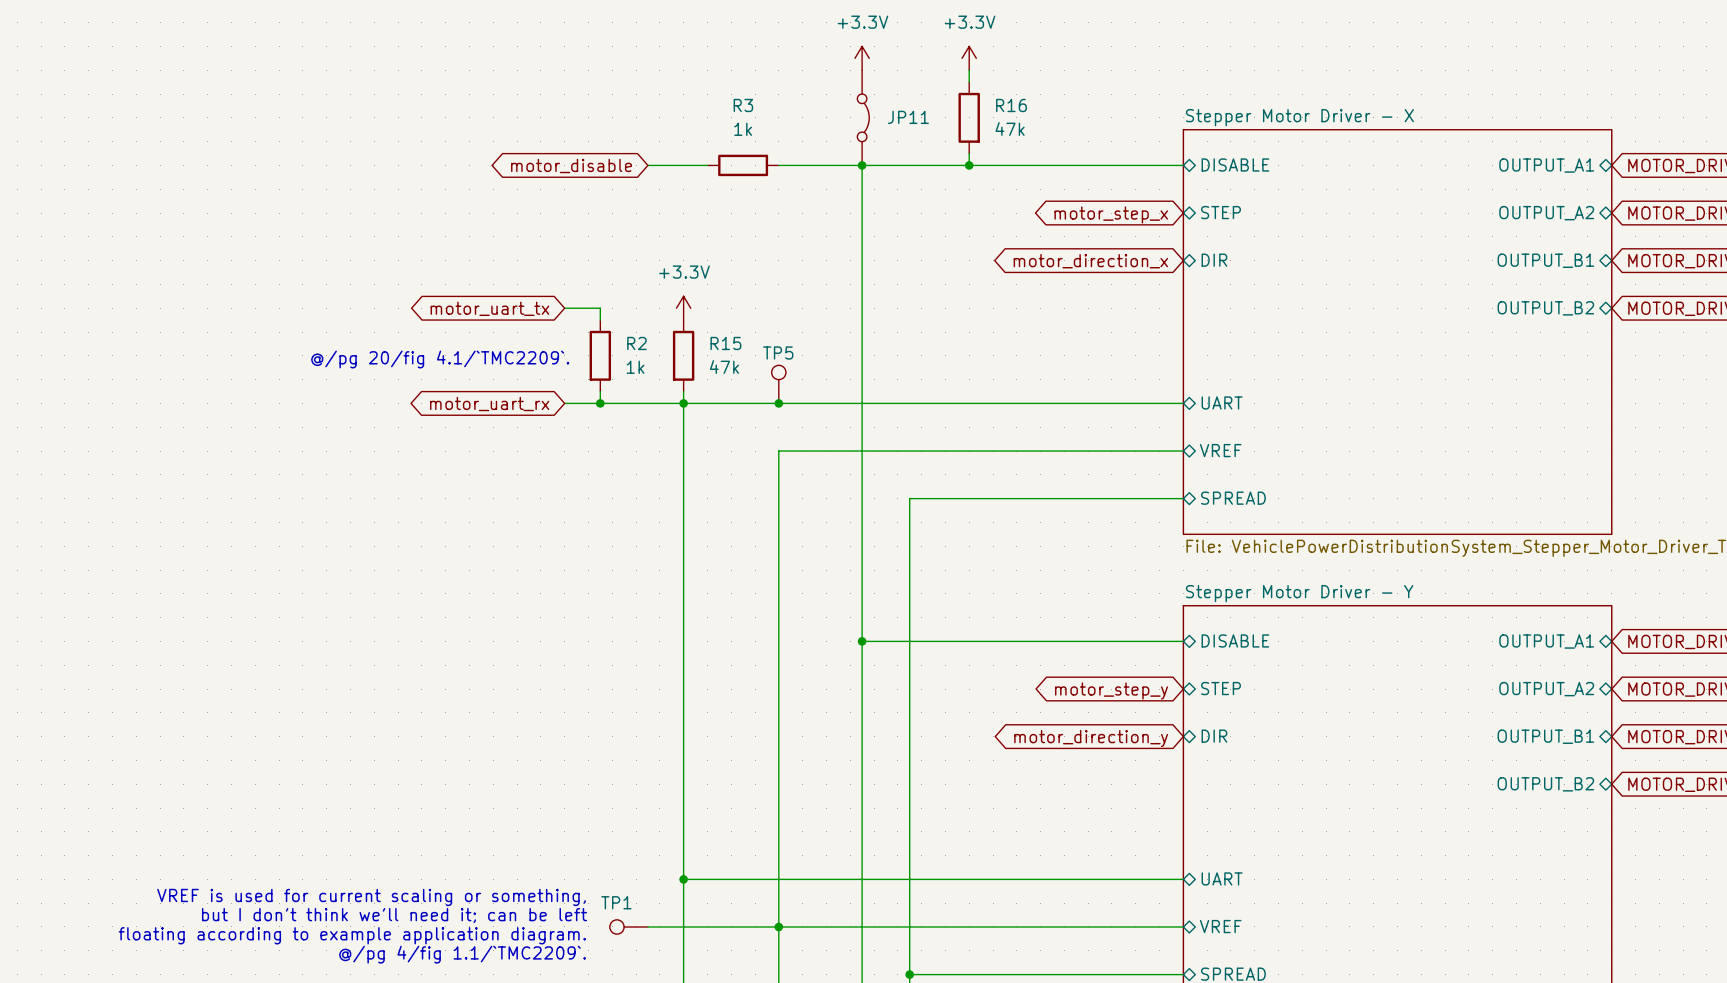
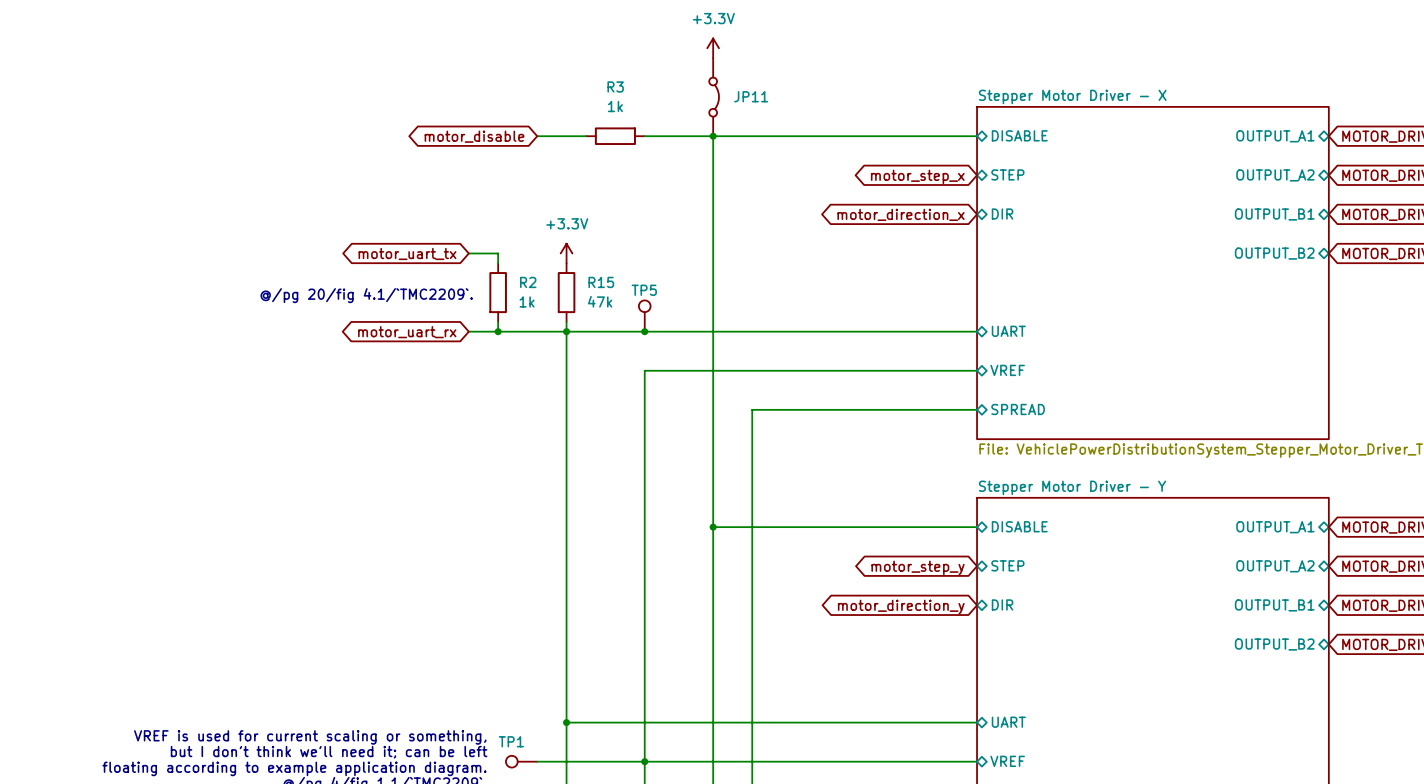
power symbol: +3.3V (969, 58) -> none
wire: (969, 70) (969, 82) -> none
R16: 47k (969, 117) -> none
wire: (969, 153) (969, 165) -> none
junction: (969, 165) -> none

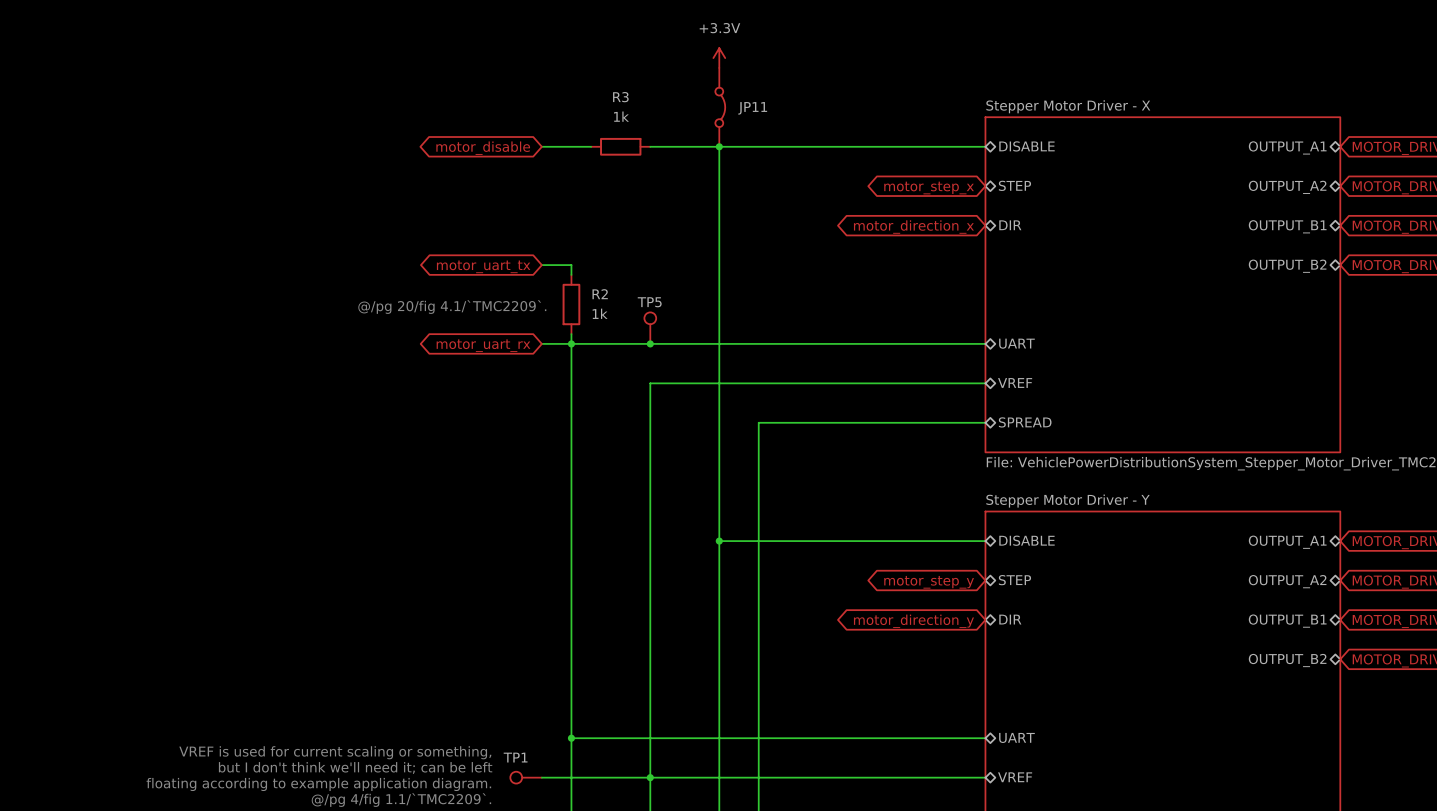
global label position: motor_uart_tx (407, 253) -> motor_uart_tx (483, 266)
wire: (468, 253) (498, 253) (498, 263) -> (541, 265) (571, 265) (571, 274)
power symbol: +3.3V (566, 253) -> none
R15 name: R15 (601, 282) -> R2 (600, 294)
R2: 1k (498, 292) -> none
text position: @/pg 20/fig 4.1/`TMC2209`. (366, 295) -> @/pg 20/fig 4.1/`TMC2209`. (452, 307)
R15 value: 47k (600, 301) -> 1k (600, 313)
wire: (498, 321) (498, 331) -> none
wire: (468, 331) (537, 331) -> none
junction: (498, 331) -> none
global label position: motor_uart_rx (407, 332) -> motor_uart_rx (483, 345)

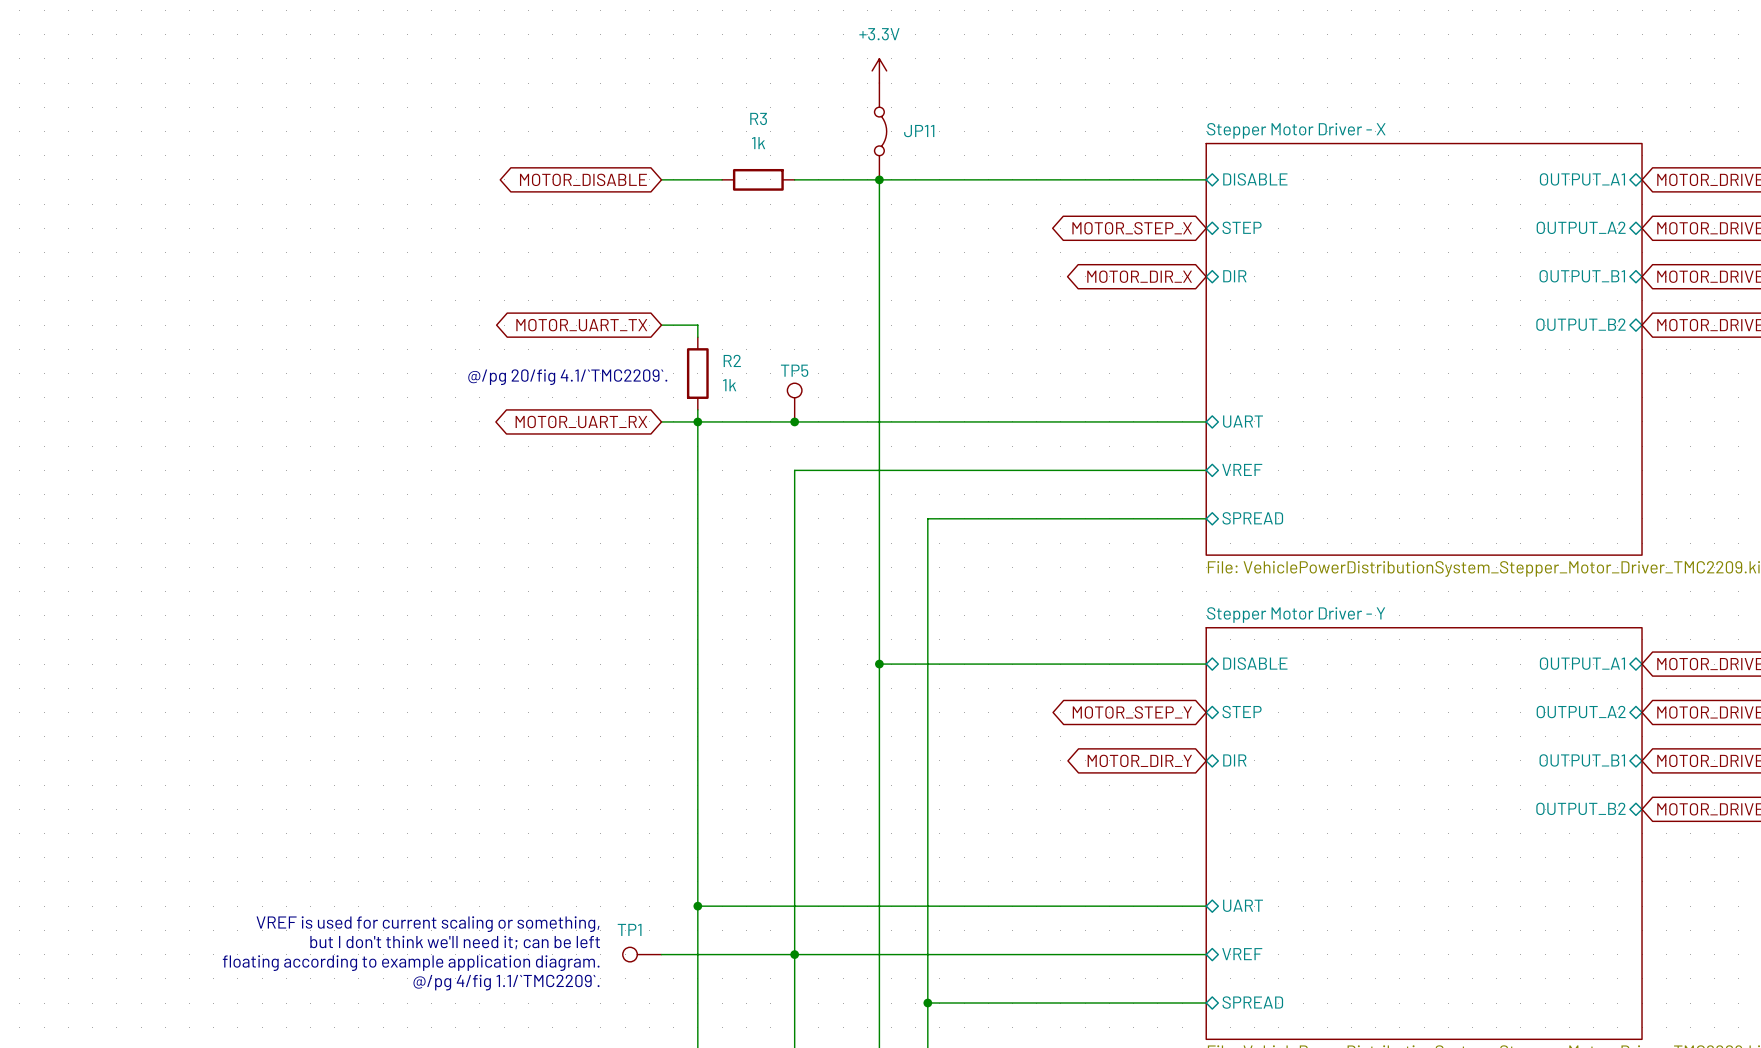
global label: motor_disable (483, 148) -> MOTOR_DISABLE (583, 179)
global label: motor_step_x (929, 187) -> MOTOR_STEP_X (1132, 228)
global label: motor_direction_x (913, 227) -> MOTOR_DIR_X (1139, 276)
global label: motor_uart_tx (483, 266) -> MOTOR_UART_TX (581, 325)
global label: motor_uart_rx (483, 345) -> MOTOR_UART_RX (581, 421)
global label: motor_step_y (929, 582) -> MOTOR_STEP_Y (1132, 712)
global label: motor_direction_y (913, 621) -> MOTOR_DIR_Y (1139, 760)

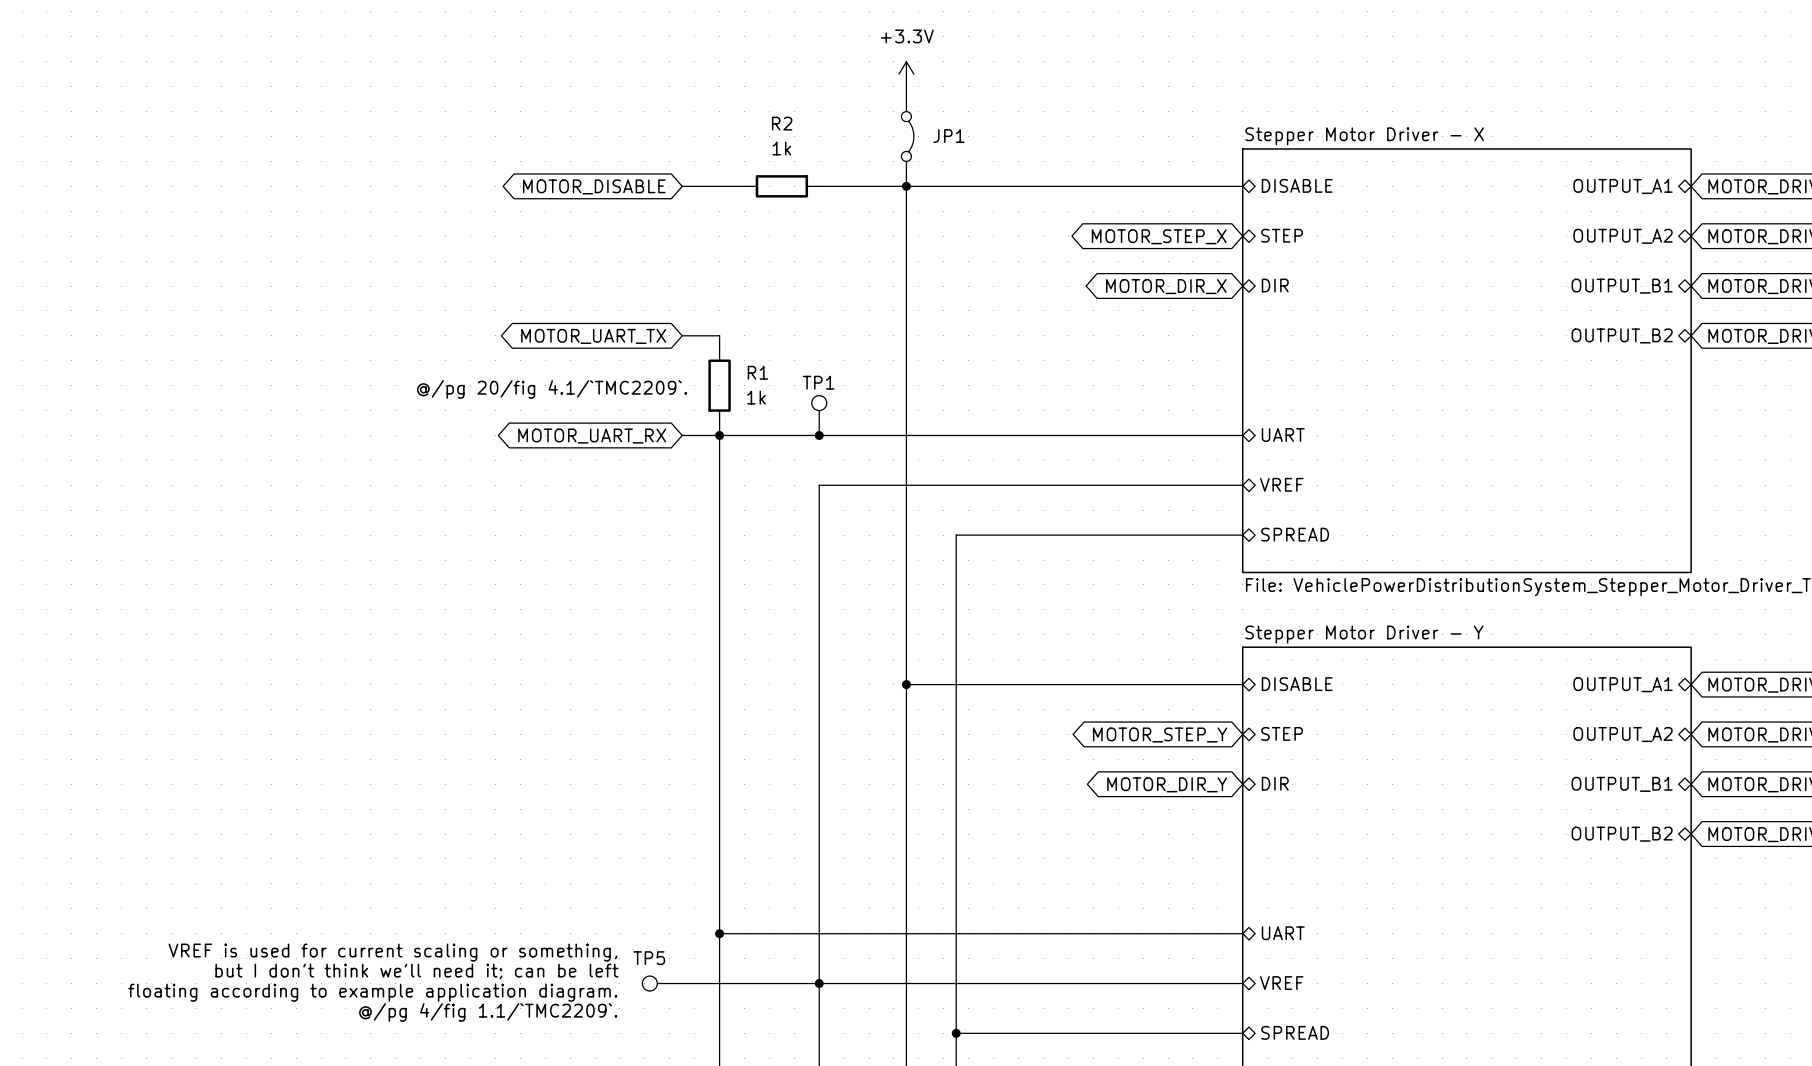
R3 name: R3 (758, 118) -> R2 (782, 123)
JP11 name: JP11 (919, 131) -> JP1 (948, 136)
R2 name: R2 (732, 360) -> R1 (757, 372)
TP5 name: TP5 (794, 370) -> TP1 (818, 382)
TP1 name: TP1 (629, 929) -> TP5 (649, 958)

